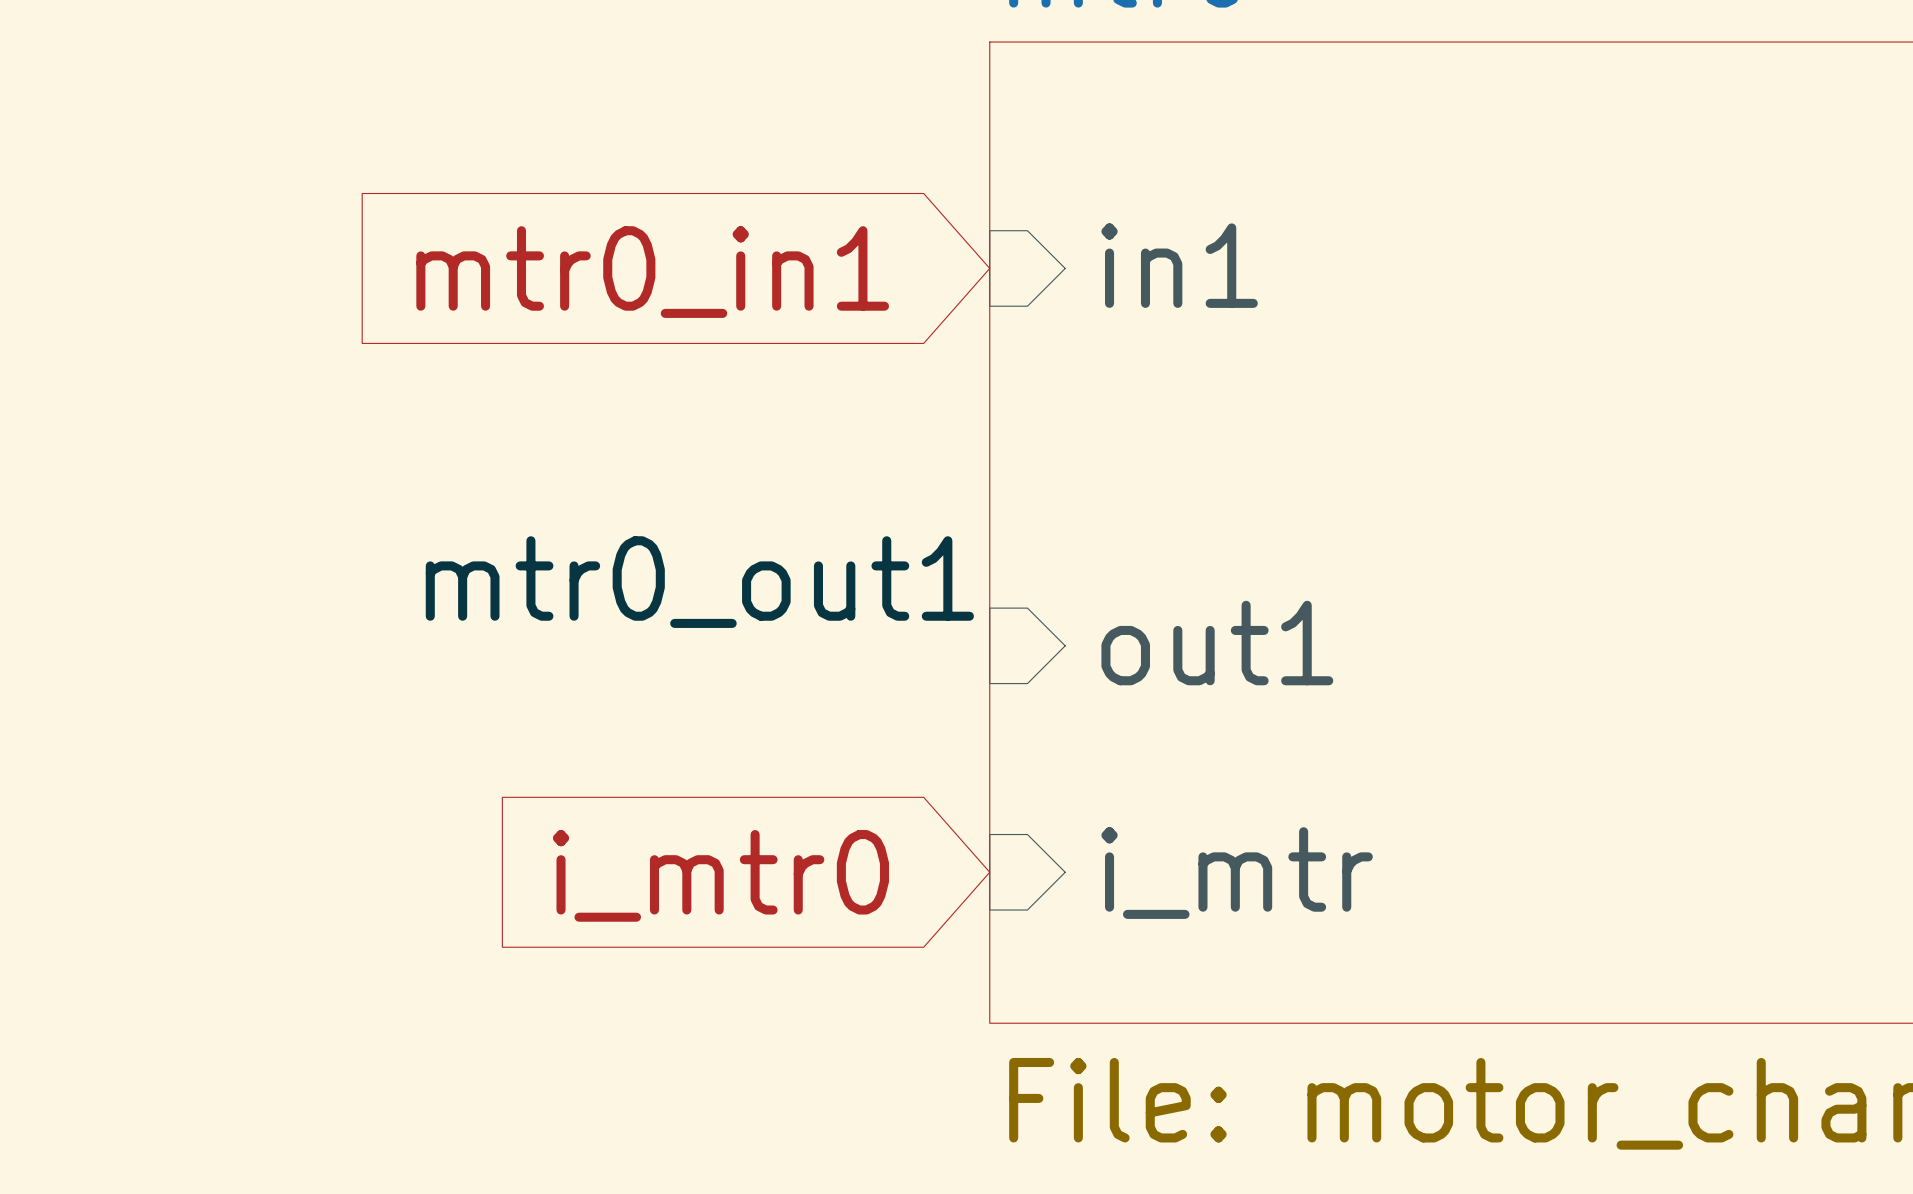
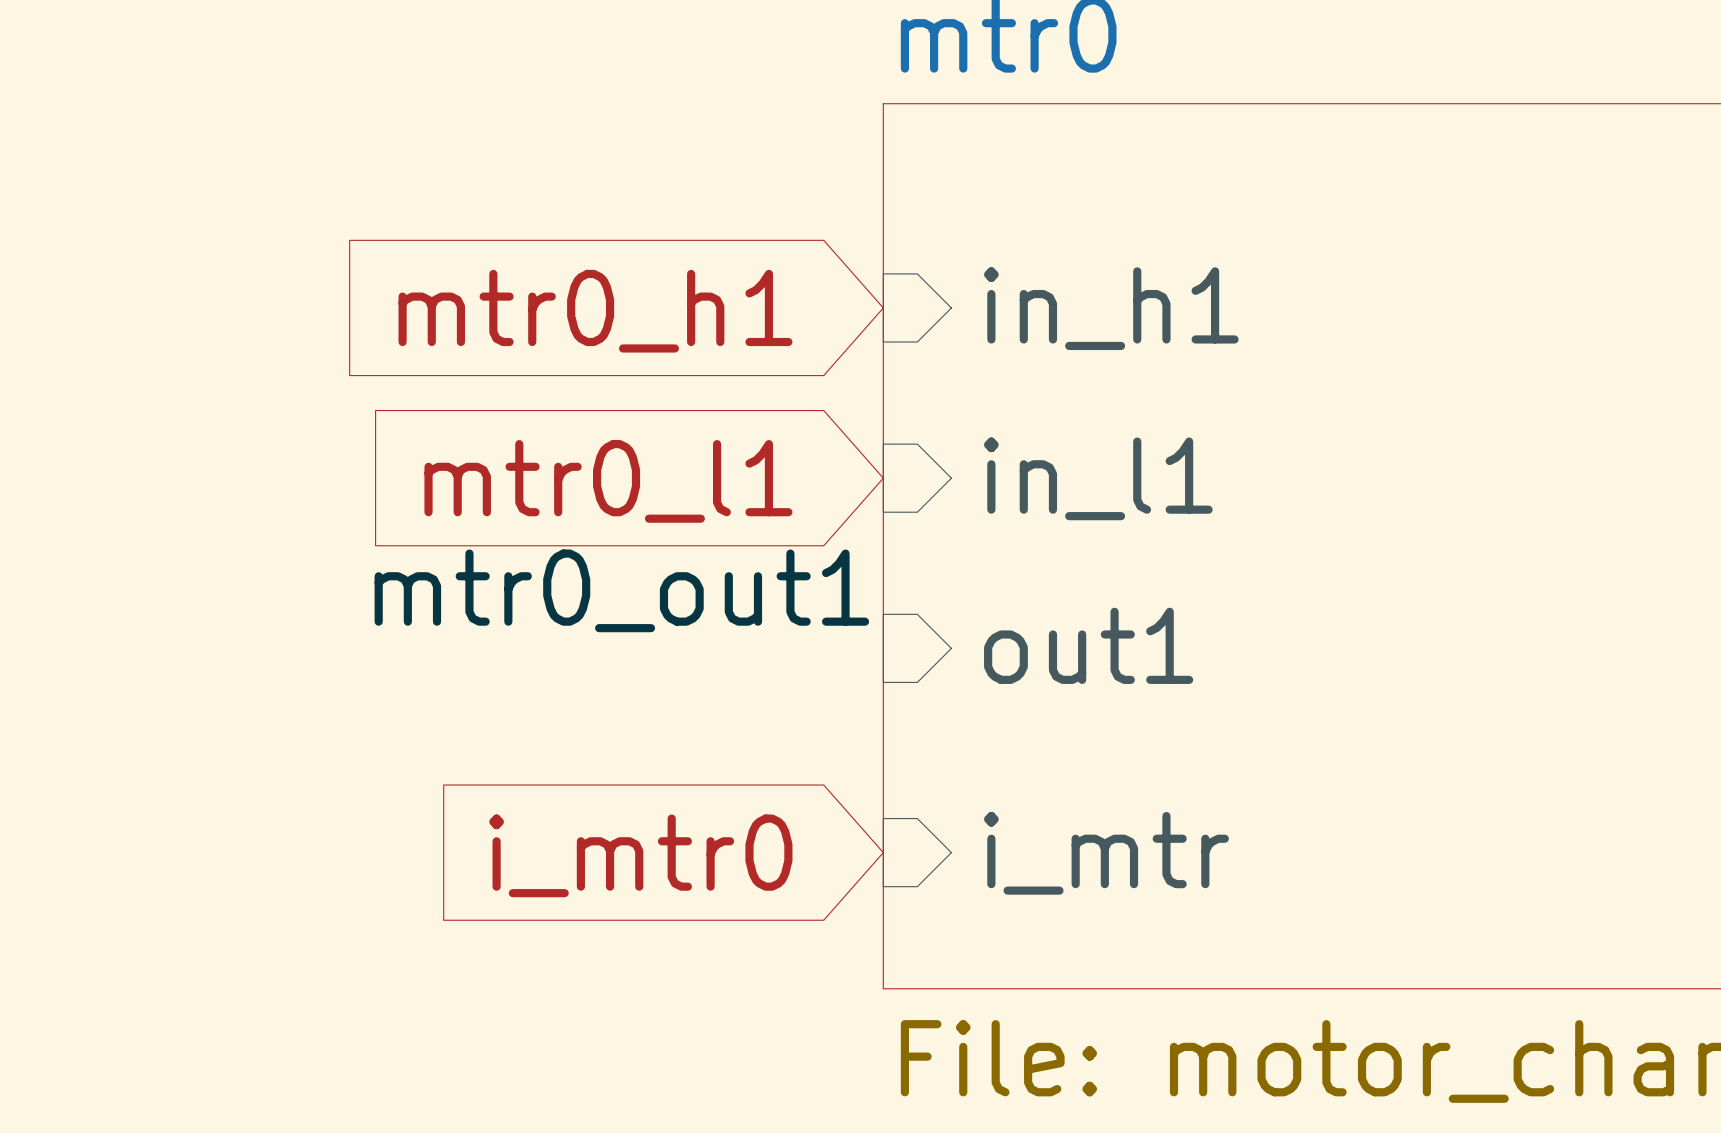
sheet pin: in1 (1179, 265) -> in_h1 (1111, 308)
global label: mtr0_in1 (652, 272) -> mtr0_h1 (595, 311)
sheet pin: none -> in_l1 (1098, 478)
global label: none -> mtr0_l1 (608, 481)

